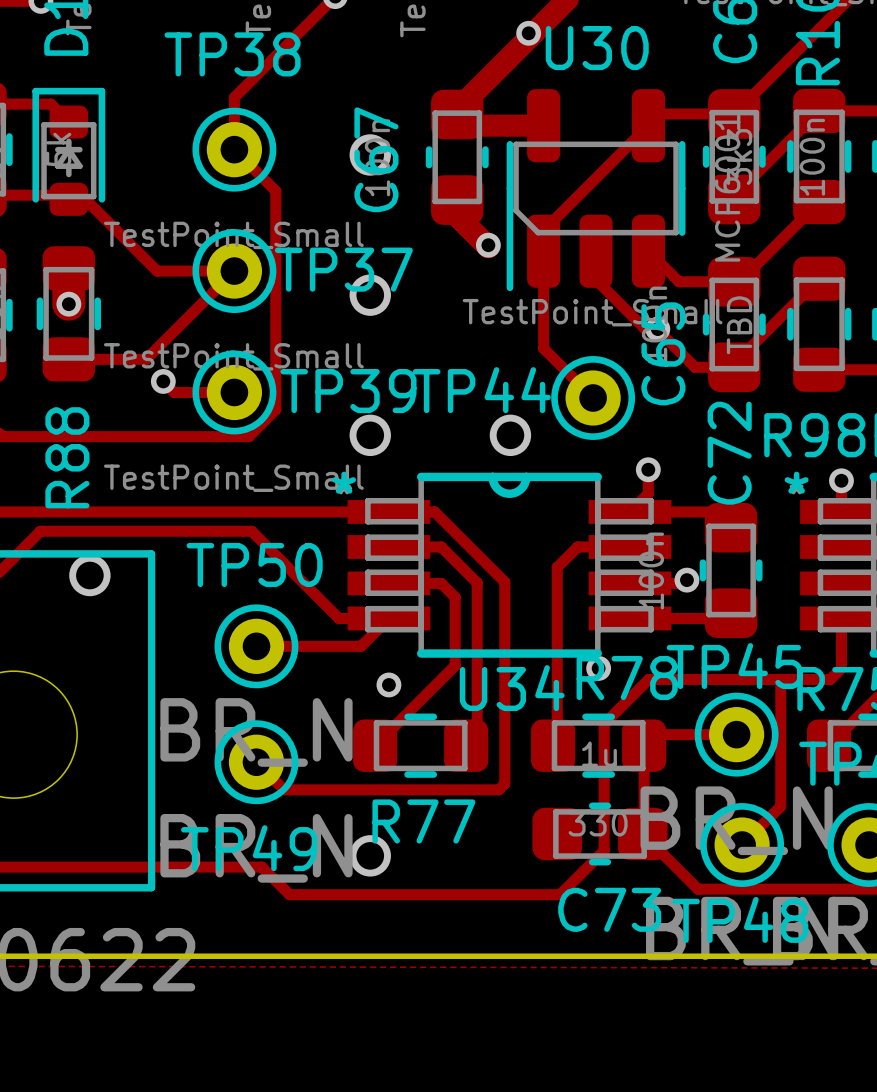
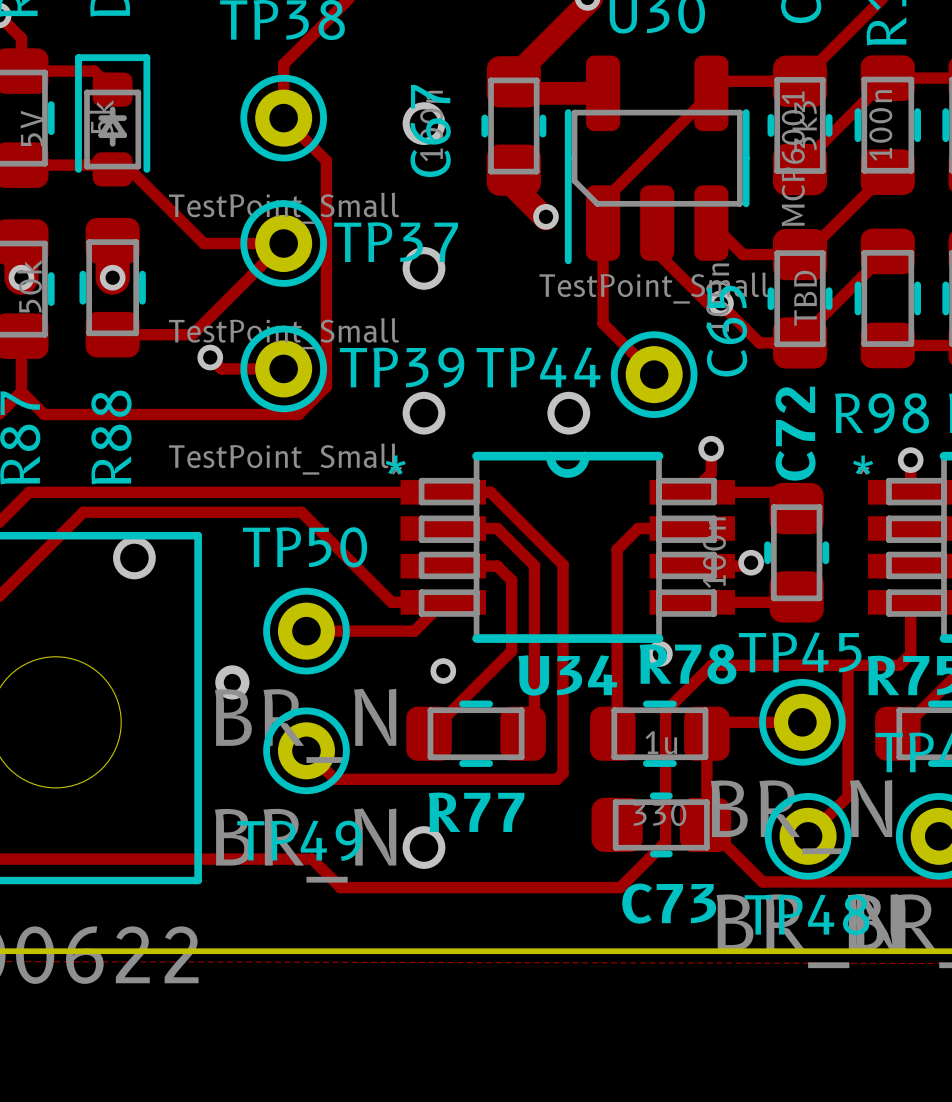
via: none -> (232, 682)

